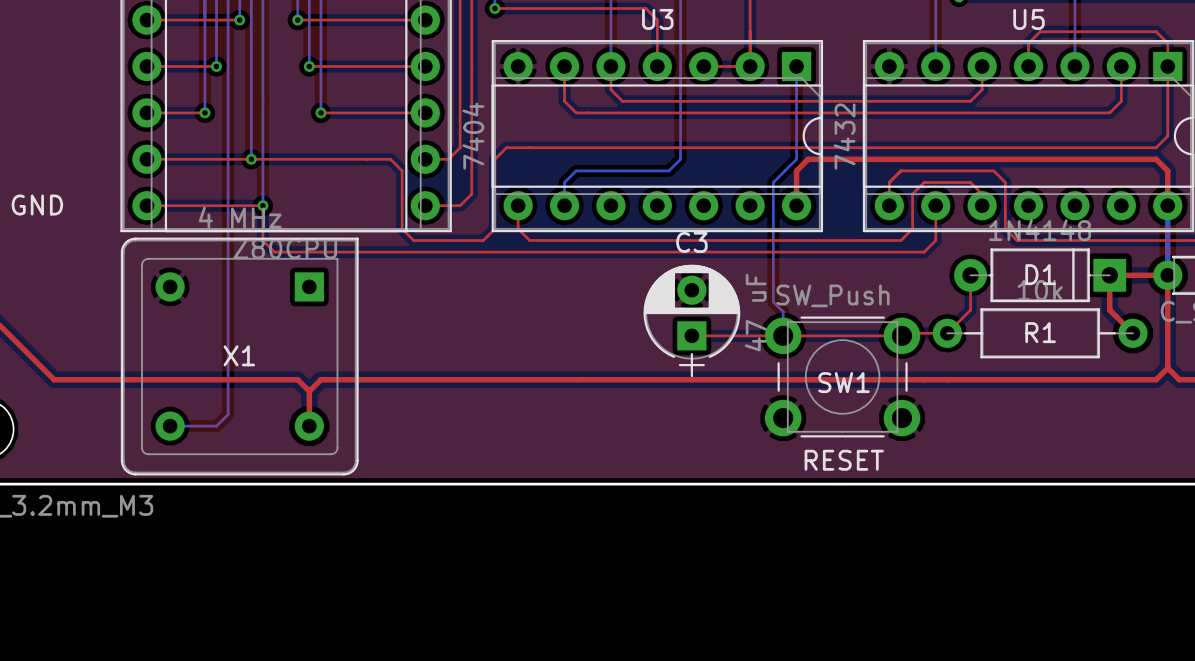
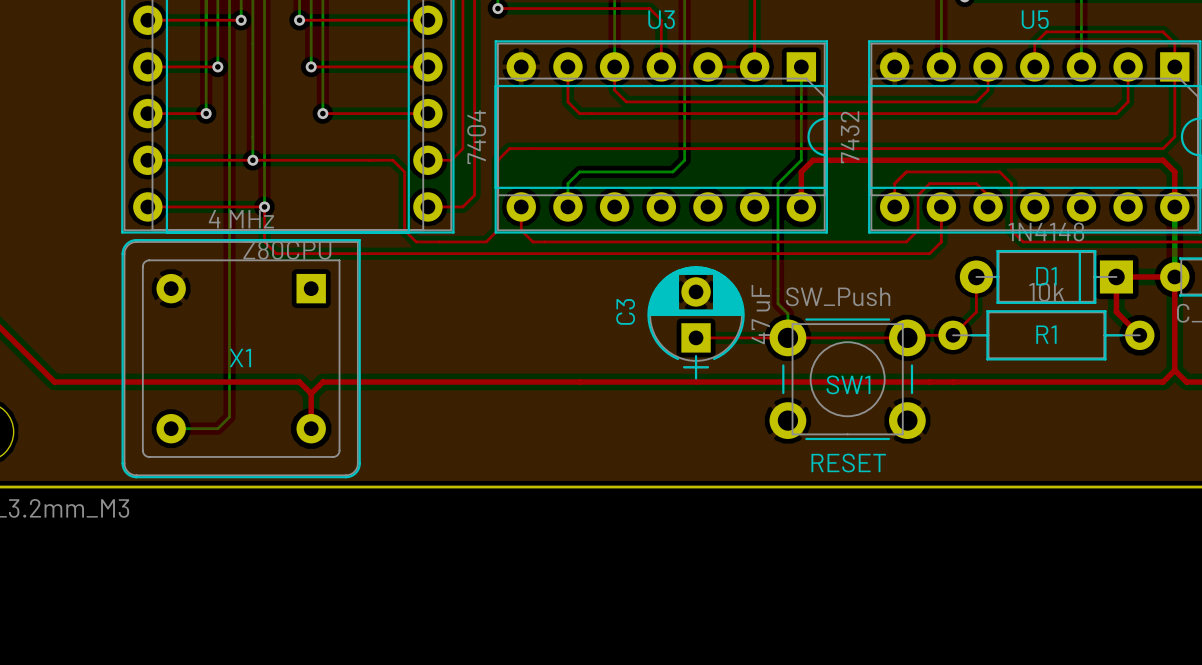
text: GND (37, 205) -> none
C3 name rotation: 0° (691, 242) -> 90° counterclockwise (625, 311)
C3 name position: C3 (691, 242) -> C3 (625, 311)

